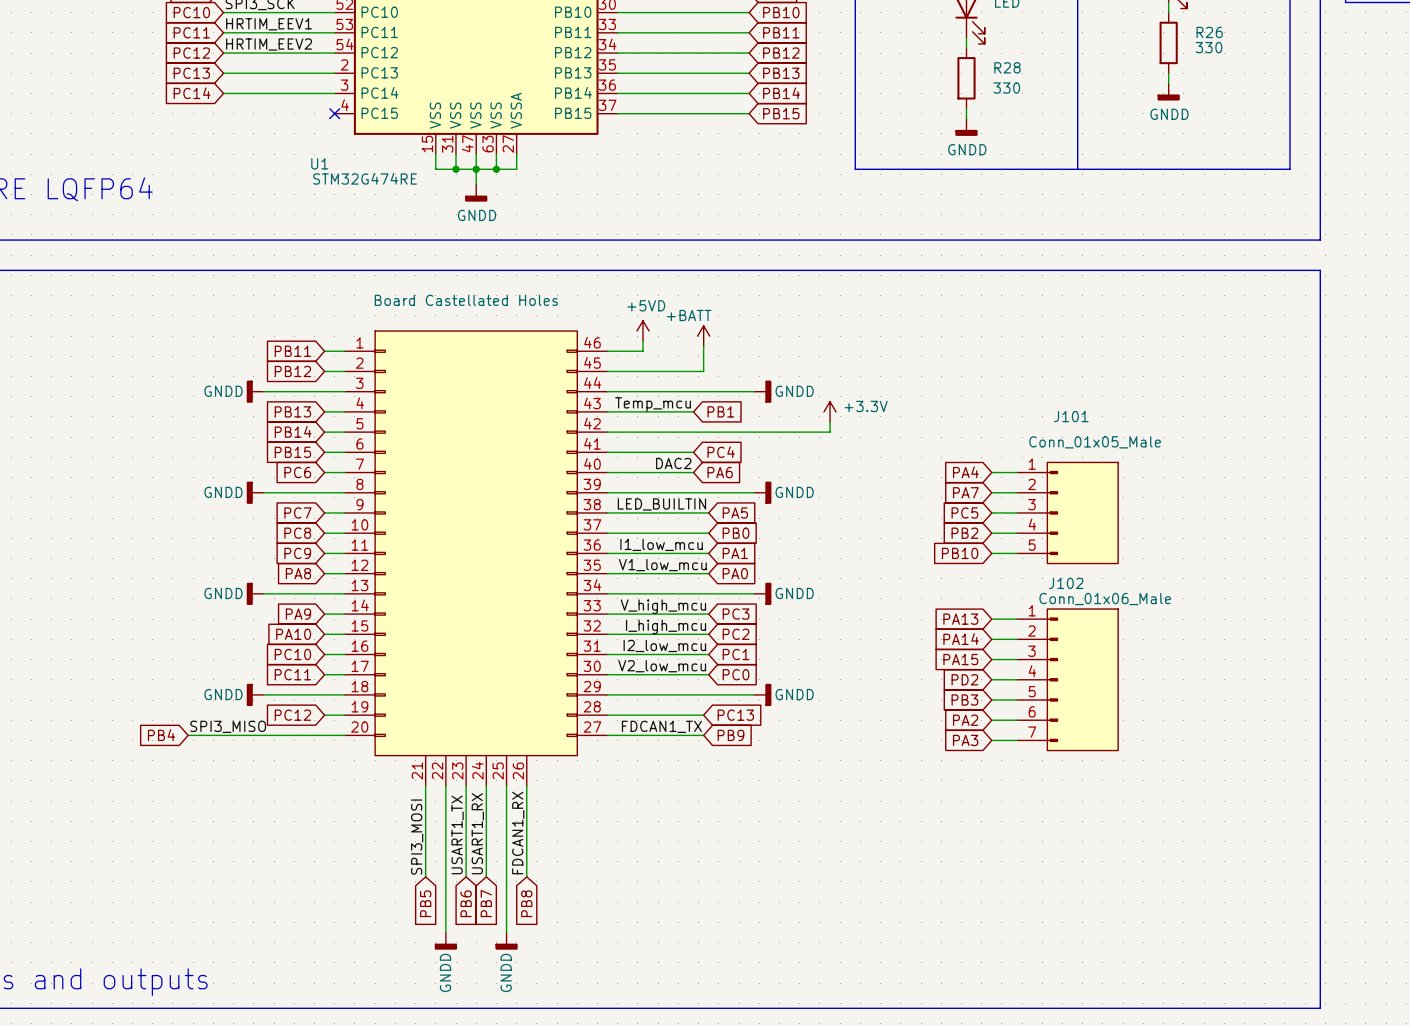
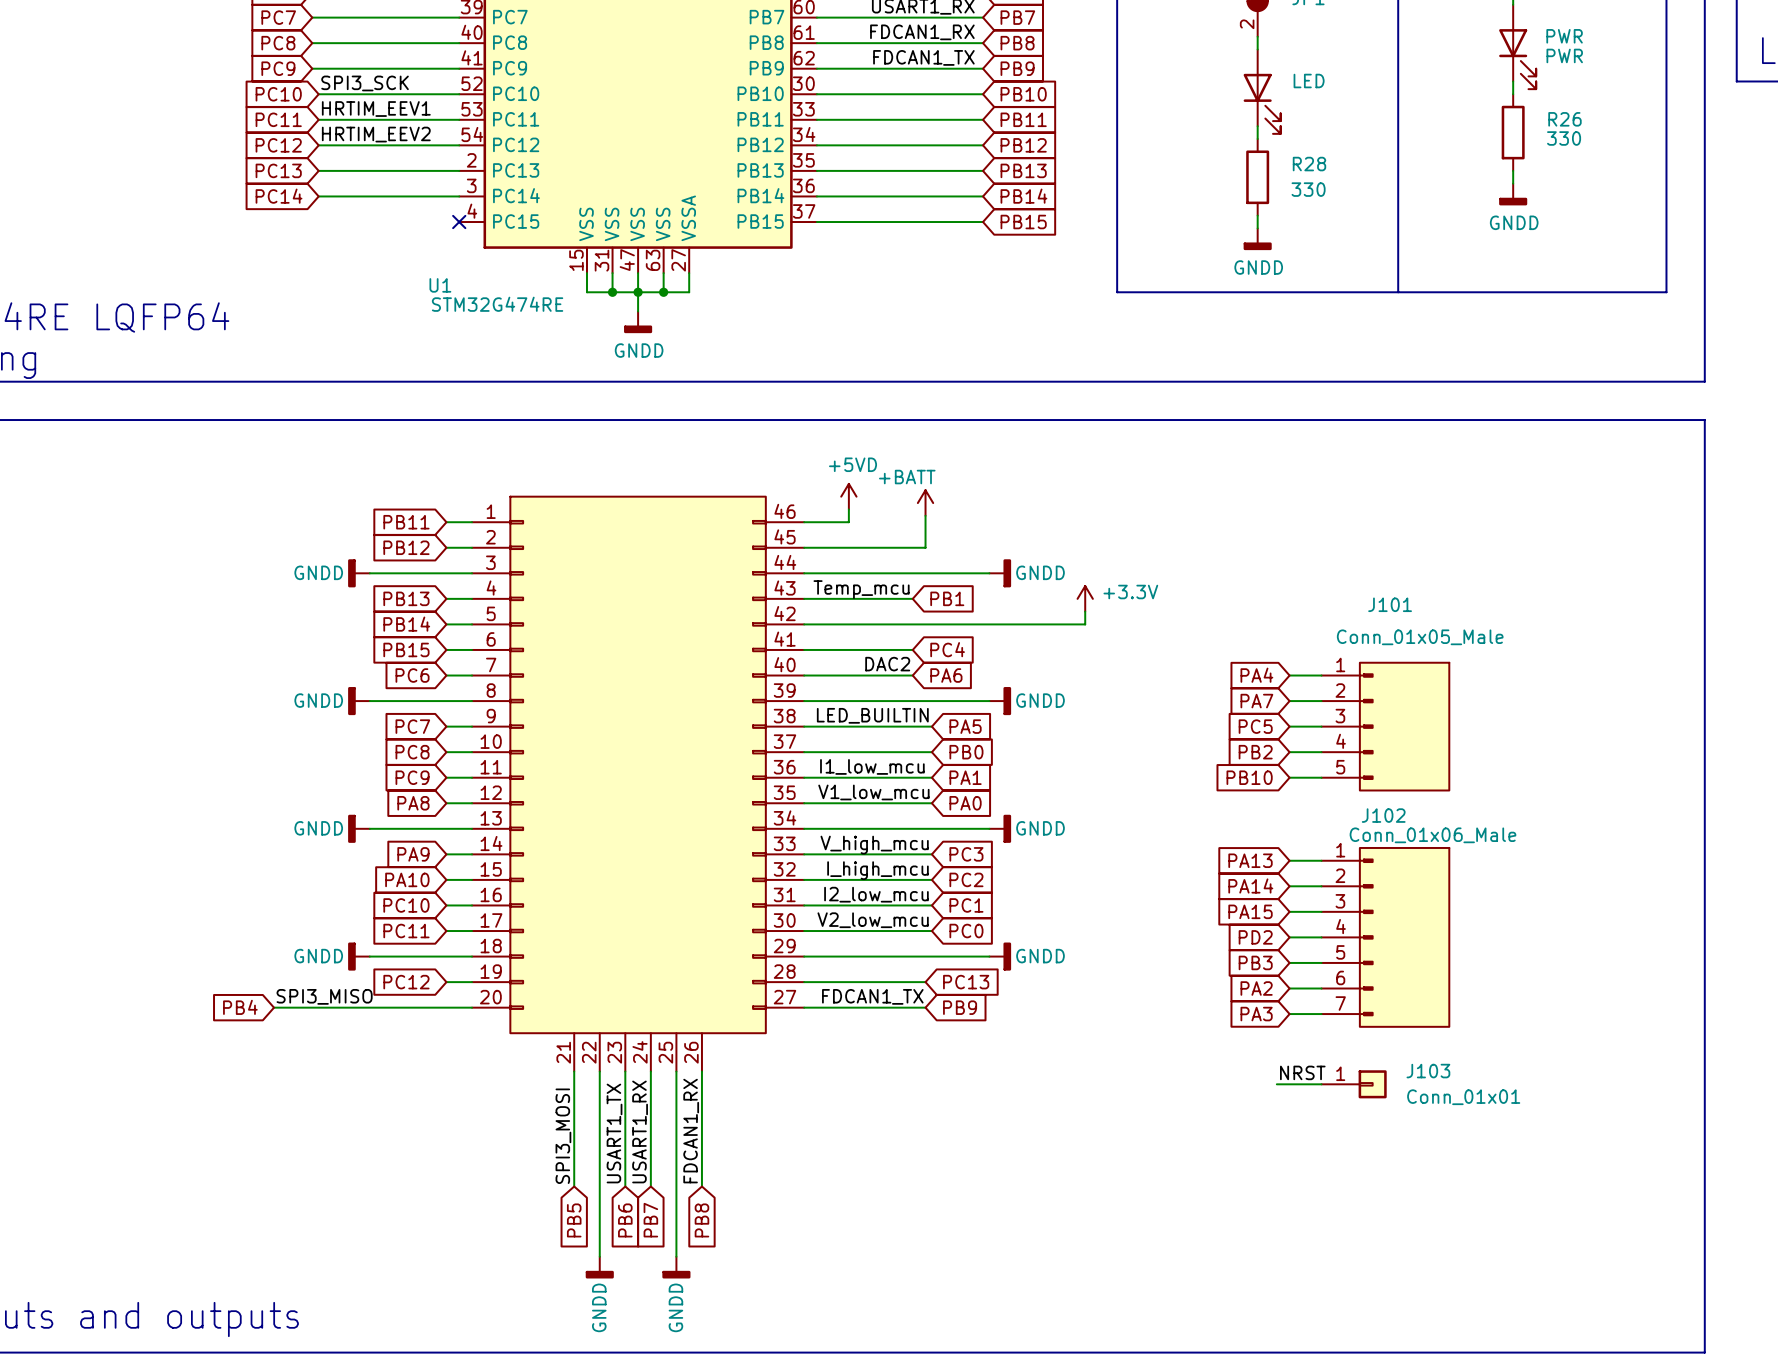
part text: Board Castellated Holes (466, 300) -> none
label: none -> NRST (1302, 1072)
wire: none -> (1276, 1084) (1321, 1084)
J103: none -> Conn_01x01 (1354, 1084)

